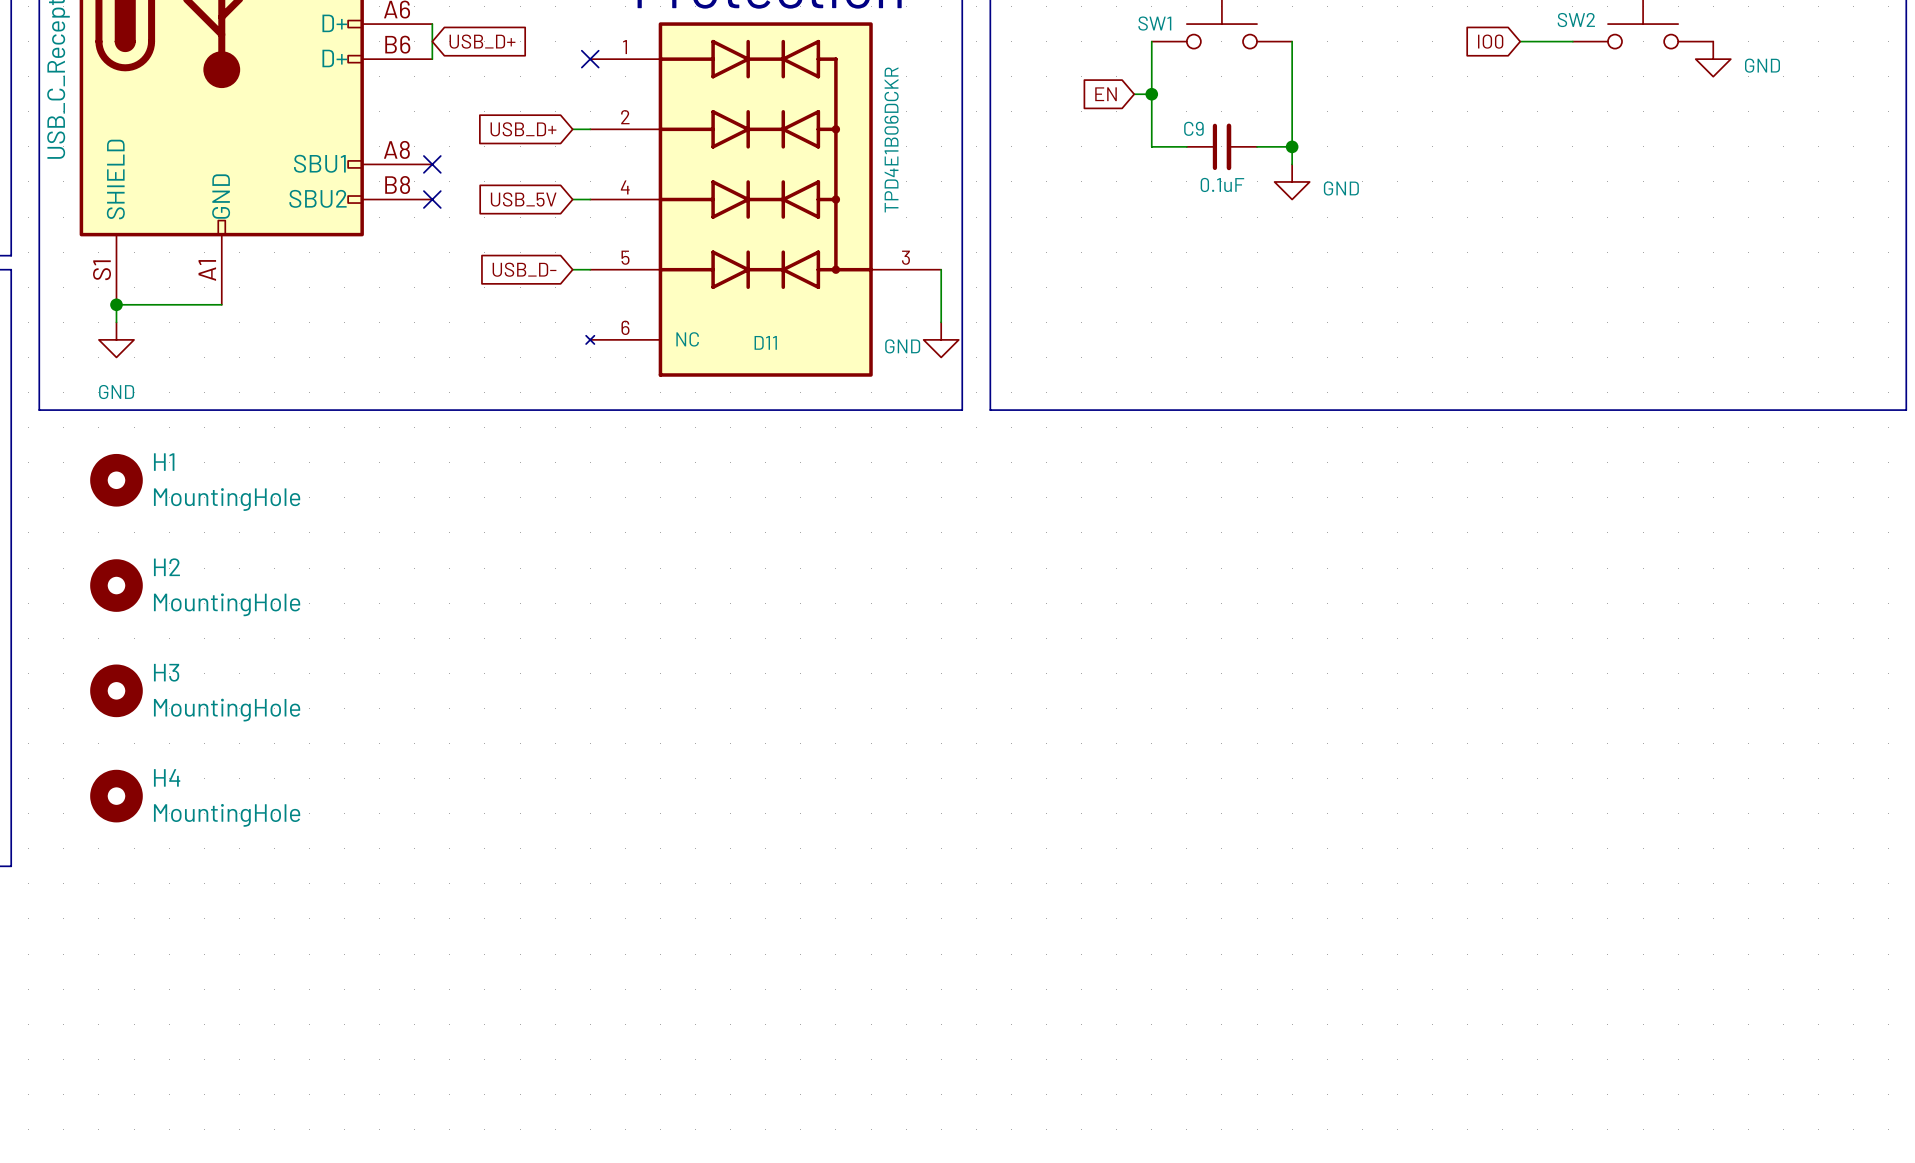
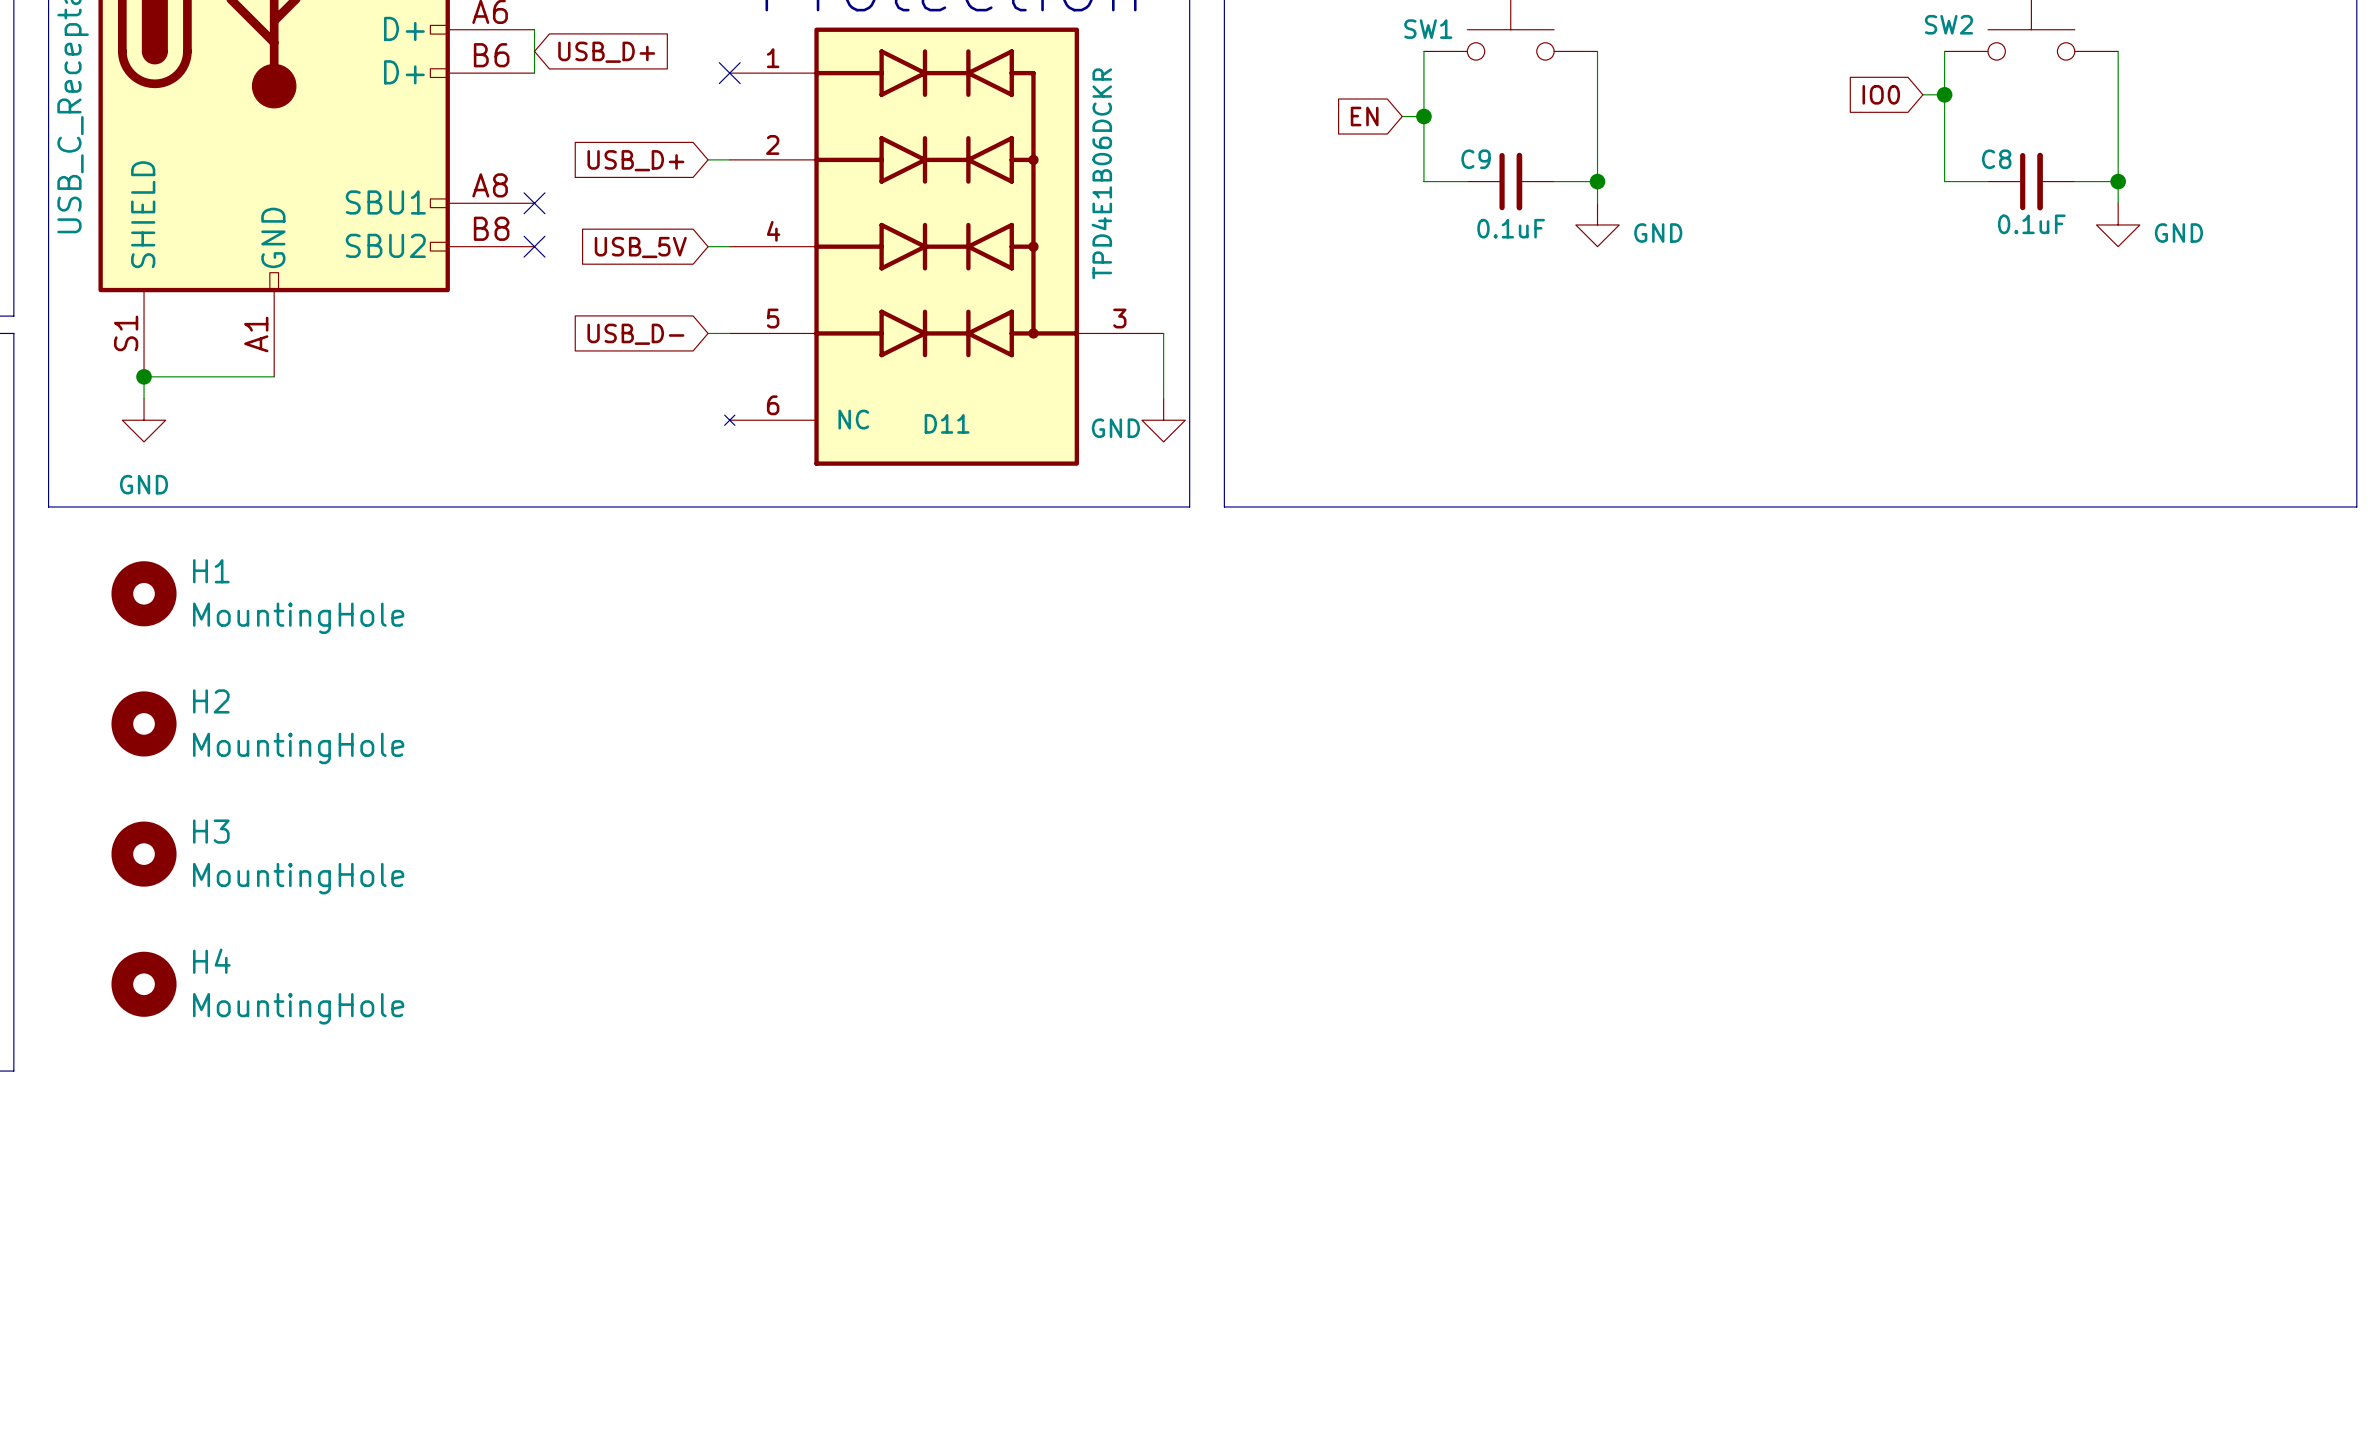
global label position: IO0 (1490, 41) -> IO0 (1881, 94)
wire: (1520, 41) (1572, 41) -> (1988, 181) (1944, 181) (1944, 51)
wire: none -> (2118, 51) (2118, 203)
power symbol position: GND (1713, 59) -> GND (2118, 224)
wire: none -> (1922, 94) (1944, 94)
junction: none -> (1944, 94)
C8: none -> 0.1uF (2031, 181)
wire: none -> (2074, 181) (2118, 181)
junction: none -> (2118, 181)

